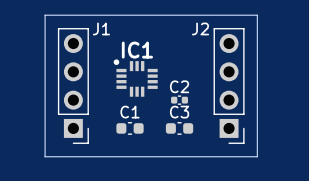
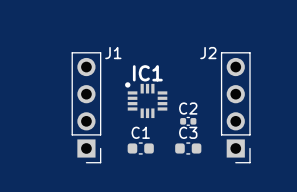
board edge: (45, 15) (257, 15) (257, 156) (45, 156) (45, 15) -> none

